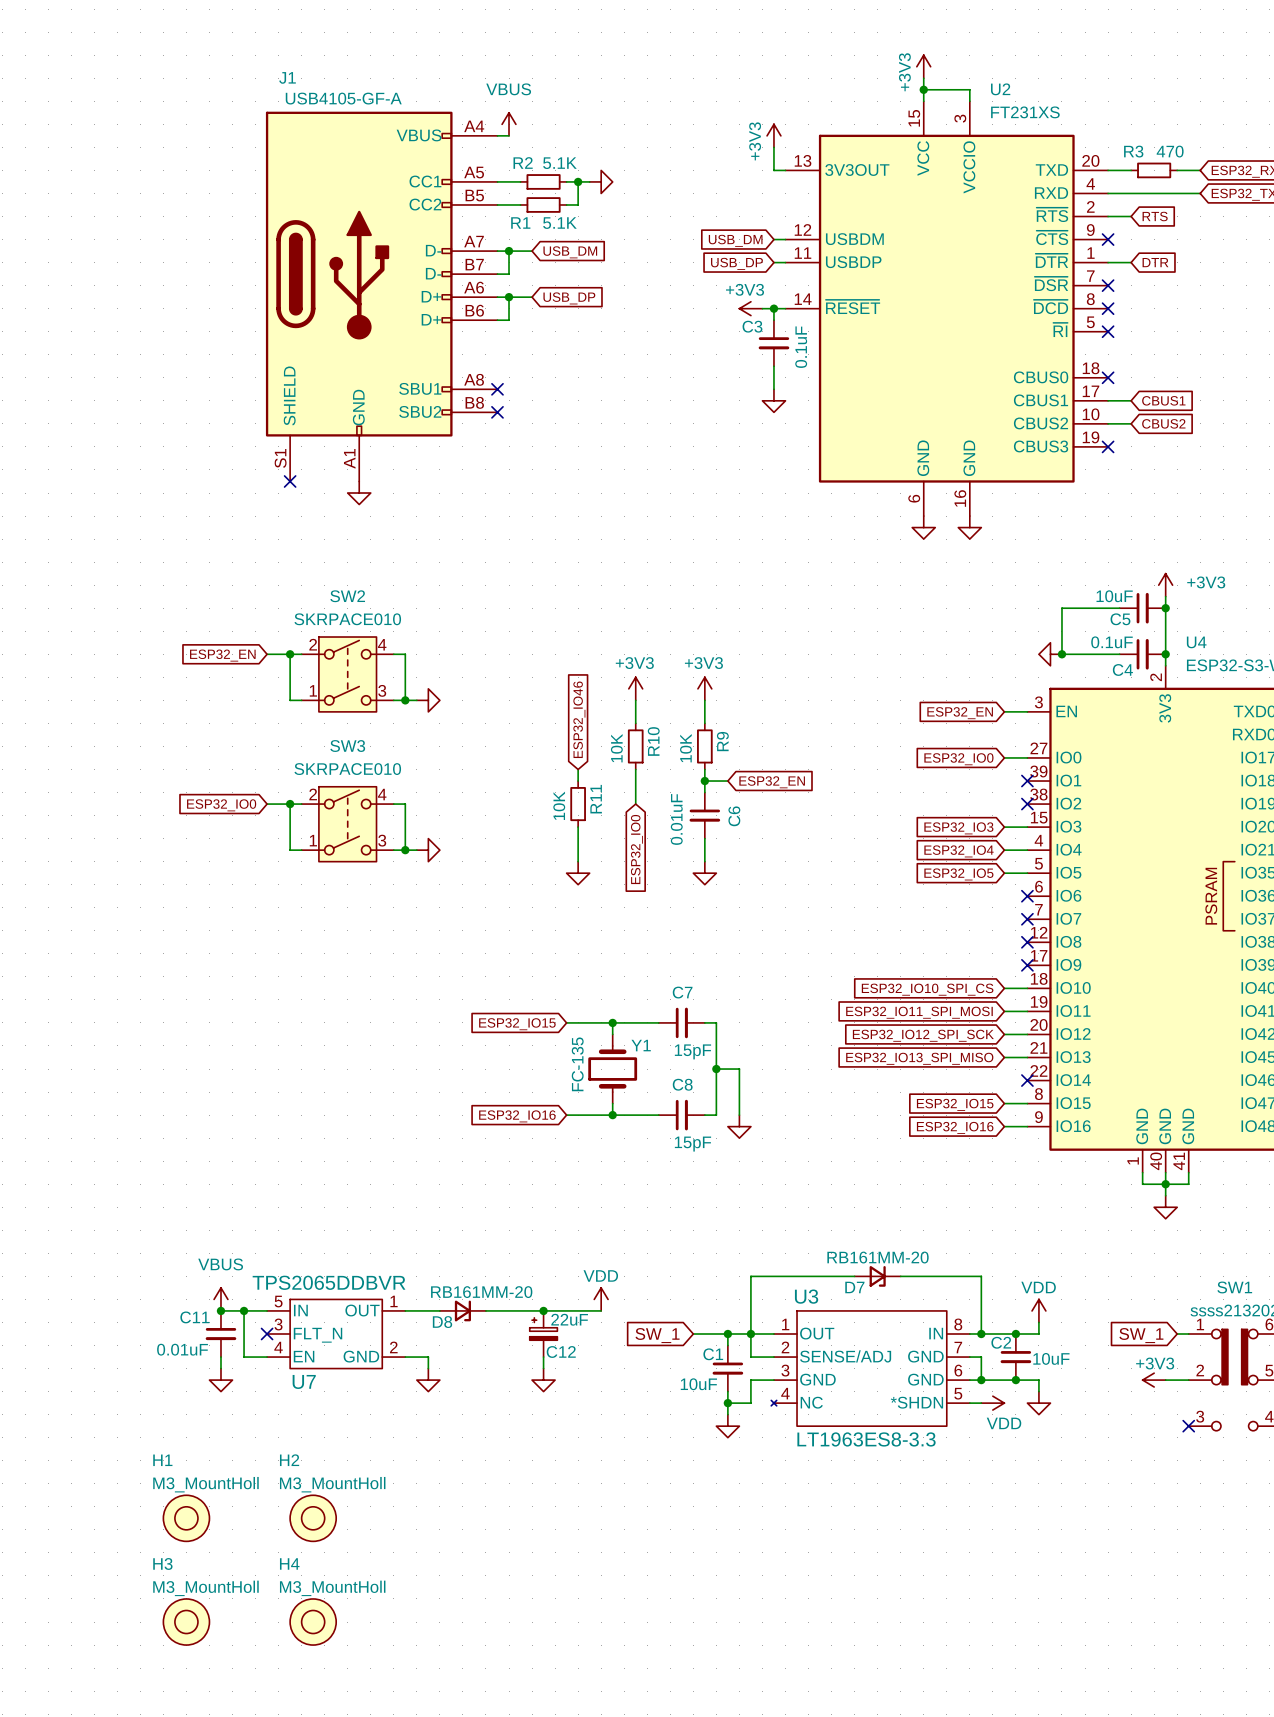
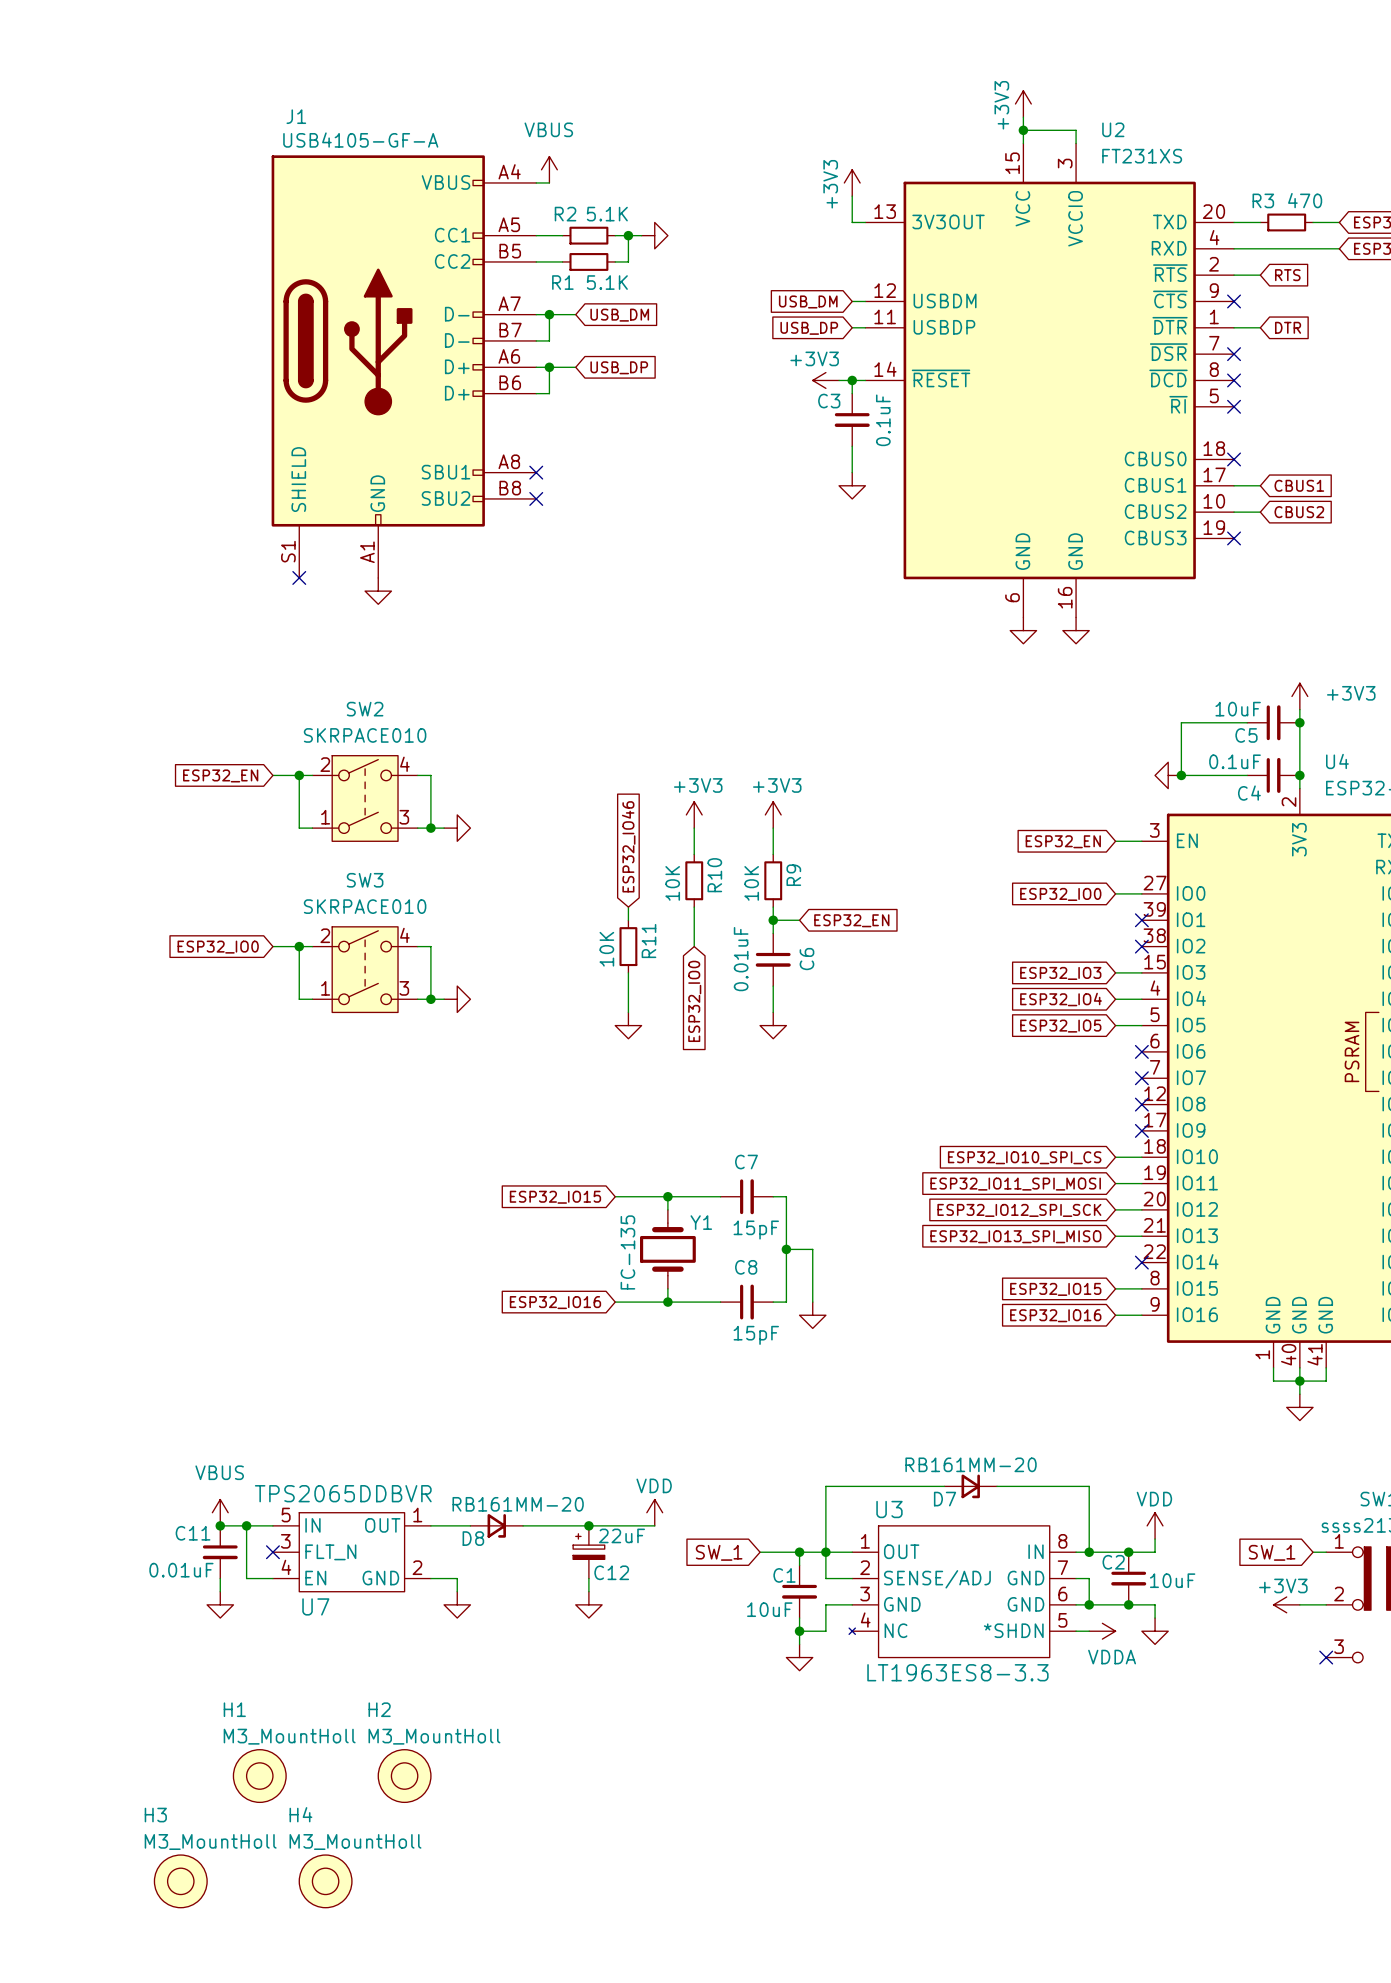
power symbol: VDD (992, 1403) -> VDDA (1102, 1631)
H1 position: (186, 1518) -> (259, 1776)
H2 position: (313, 1518) -> (404, 1776)

